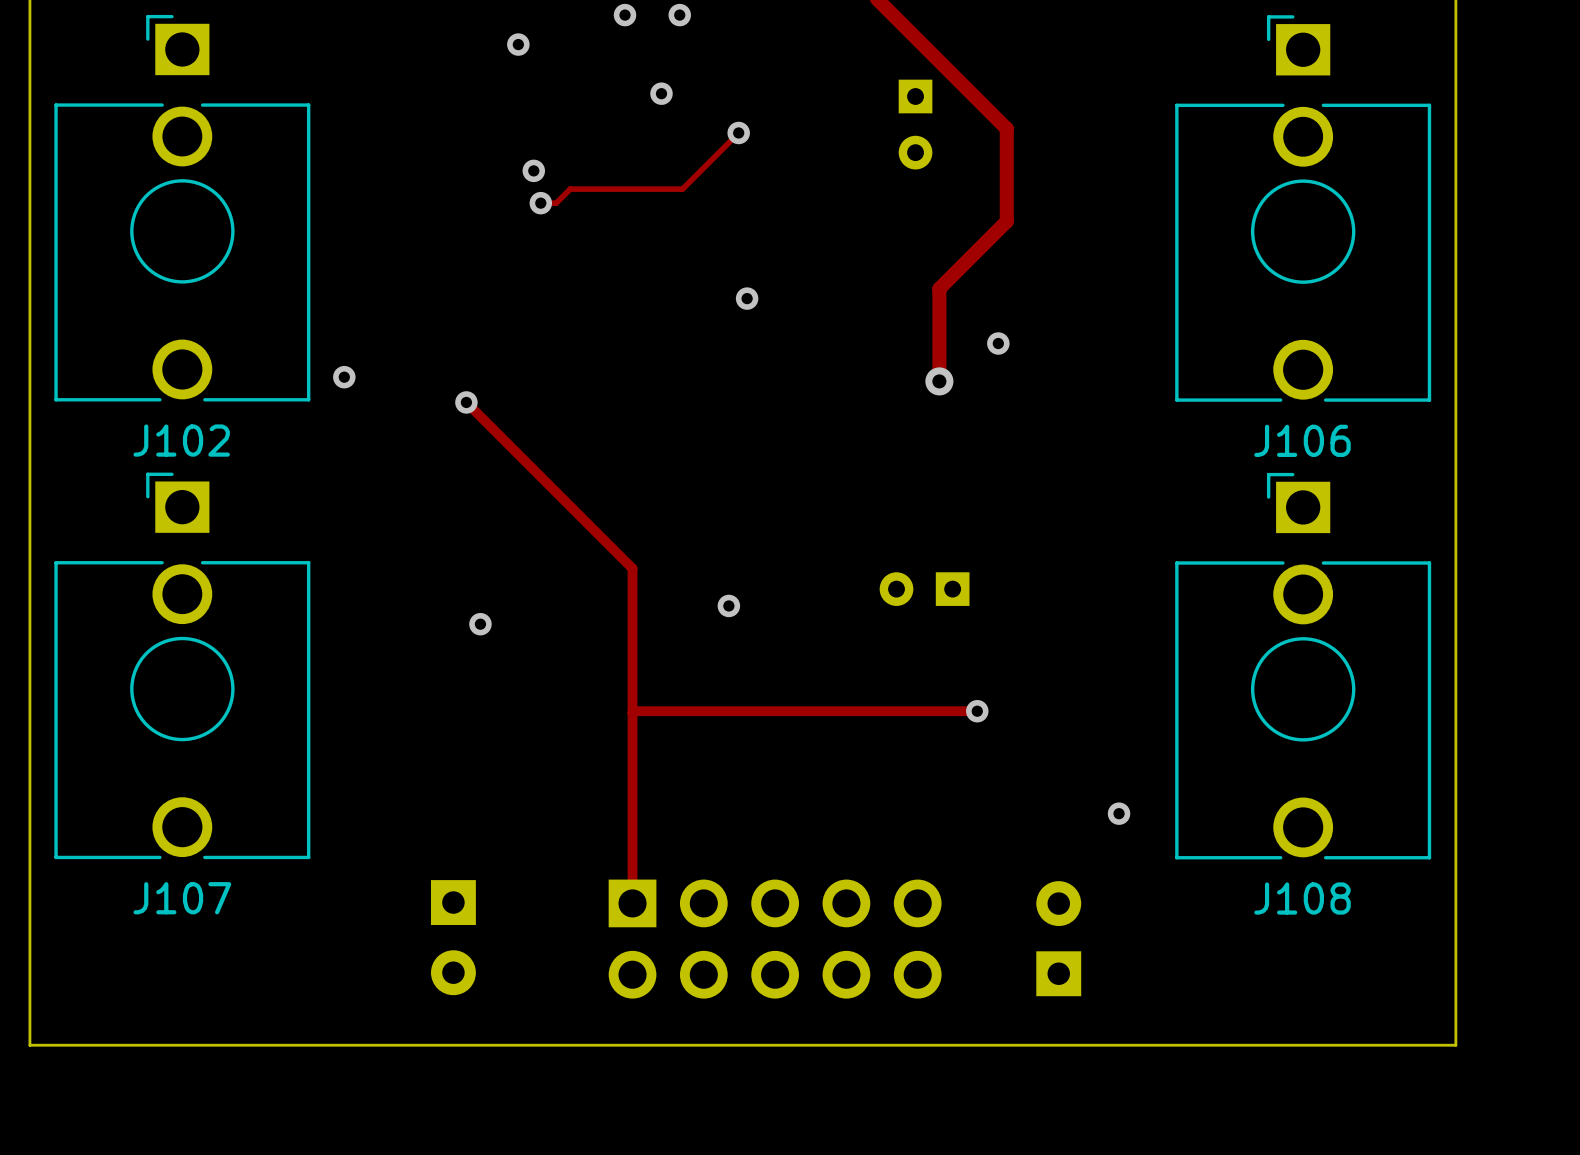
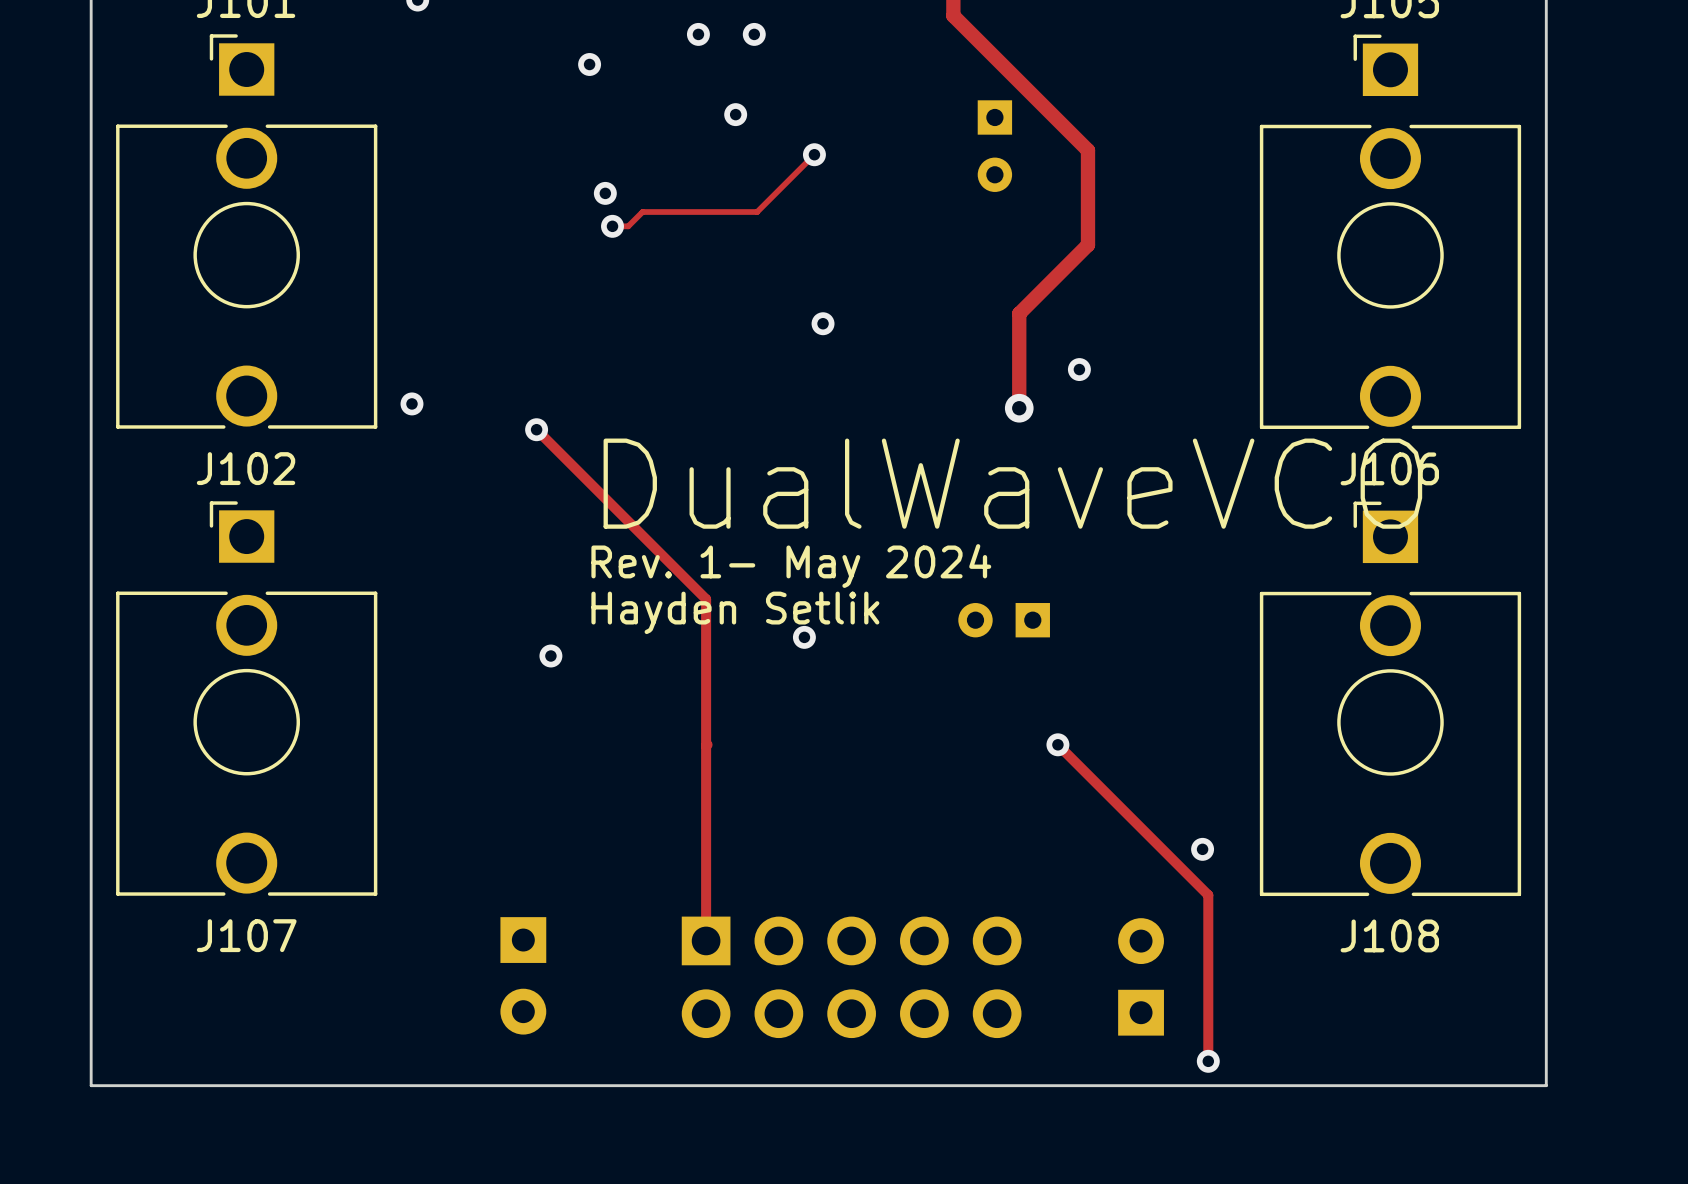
text: none -> DualWaveVCO (1012, 483)
text: none -> Rev. 1- May 2024 (791, 566)
text: none -> Hayden Setlik (735, 612)
track: (633, 711) (977, 711) -> (1208, 1061) (1208, 895) (1057, 744)
via: none -> (1208, 1061)

